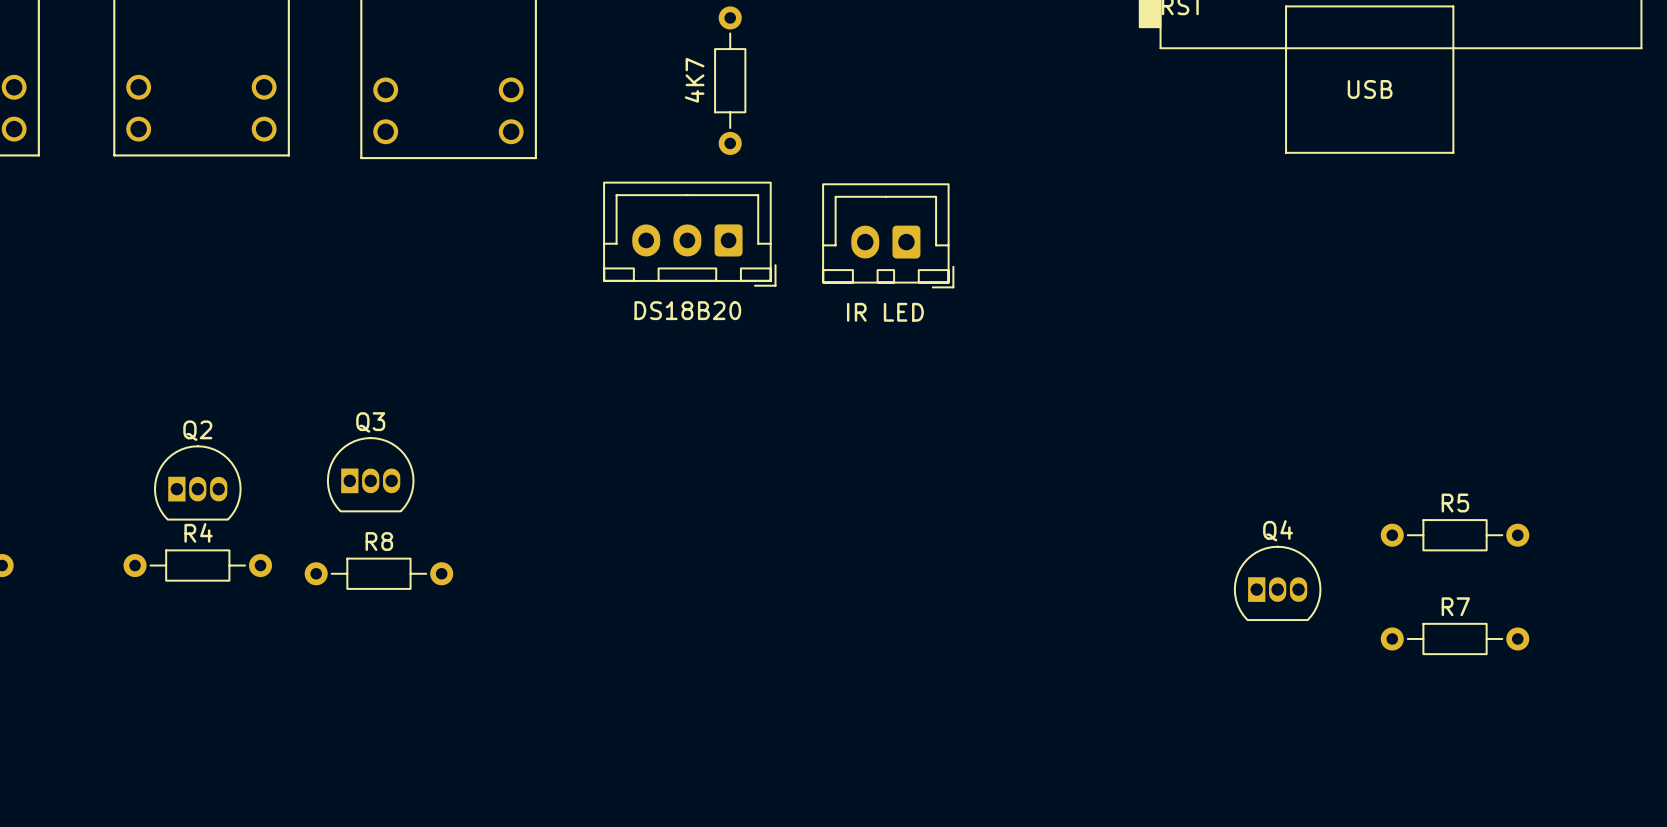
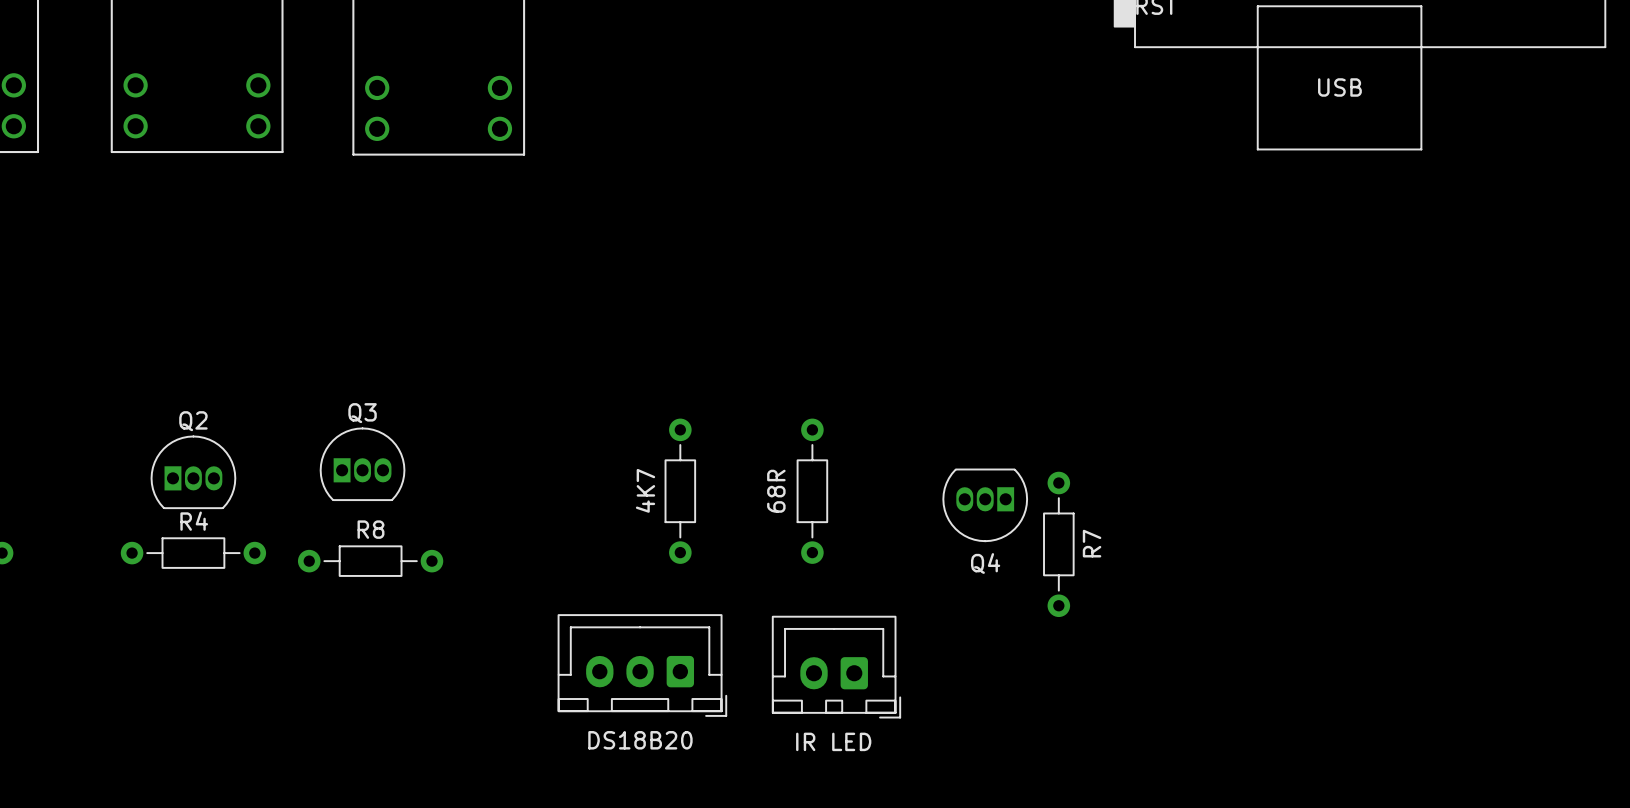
part: 4K7 (730, 80) -> none
part: DS18B20 (689, 234) -> none
part: IR LED (888, 235) -> none
part: none -> 4K7 (680, 491)
part: none -> 68R (812, 491)
R5: (1455, 535) -> none
Q4 rotation: 0° (1277, 583) -> 180° (985, 505)
Q4 position: (1277, 583) -> (985, 505)
R7 rotation: 0° (1455, 638) -> 90° clockwise (1058, 544)
R7 position: (1455, 638) -> (1058, 544)
part: none -> DS18B20 (642, 665)
part: none -> IR LED (836, 667)

